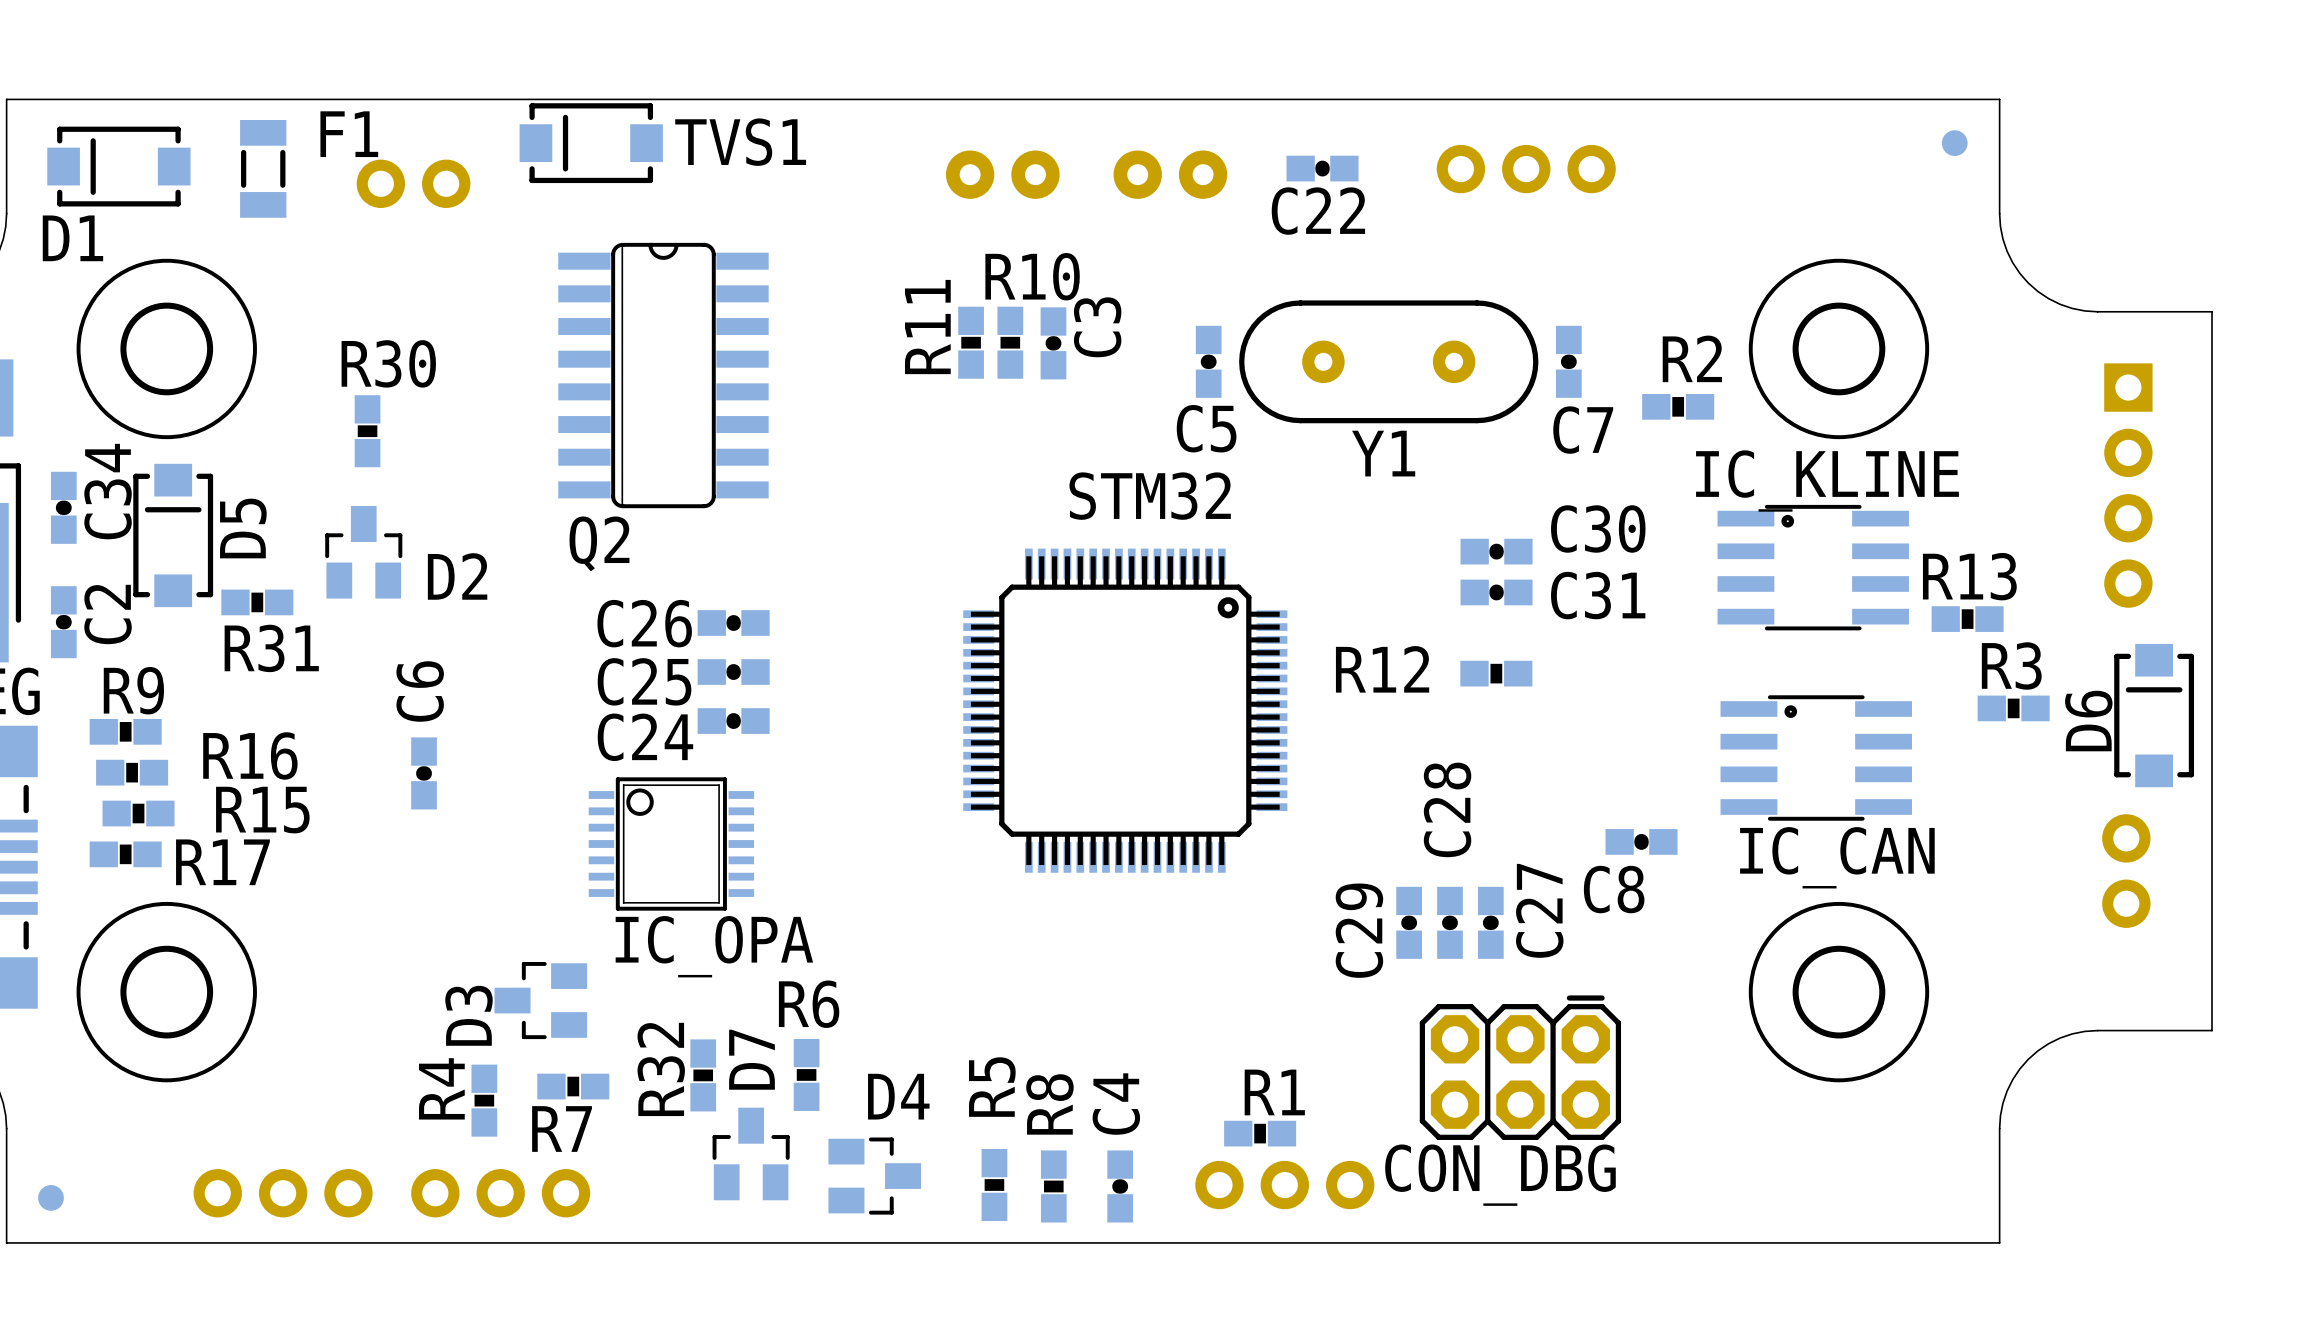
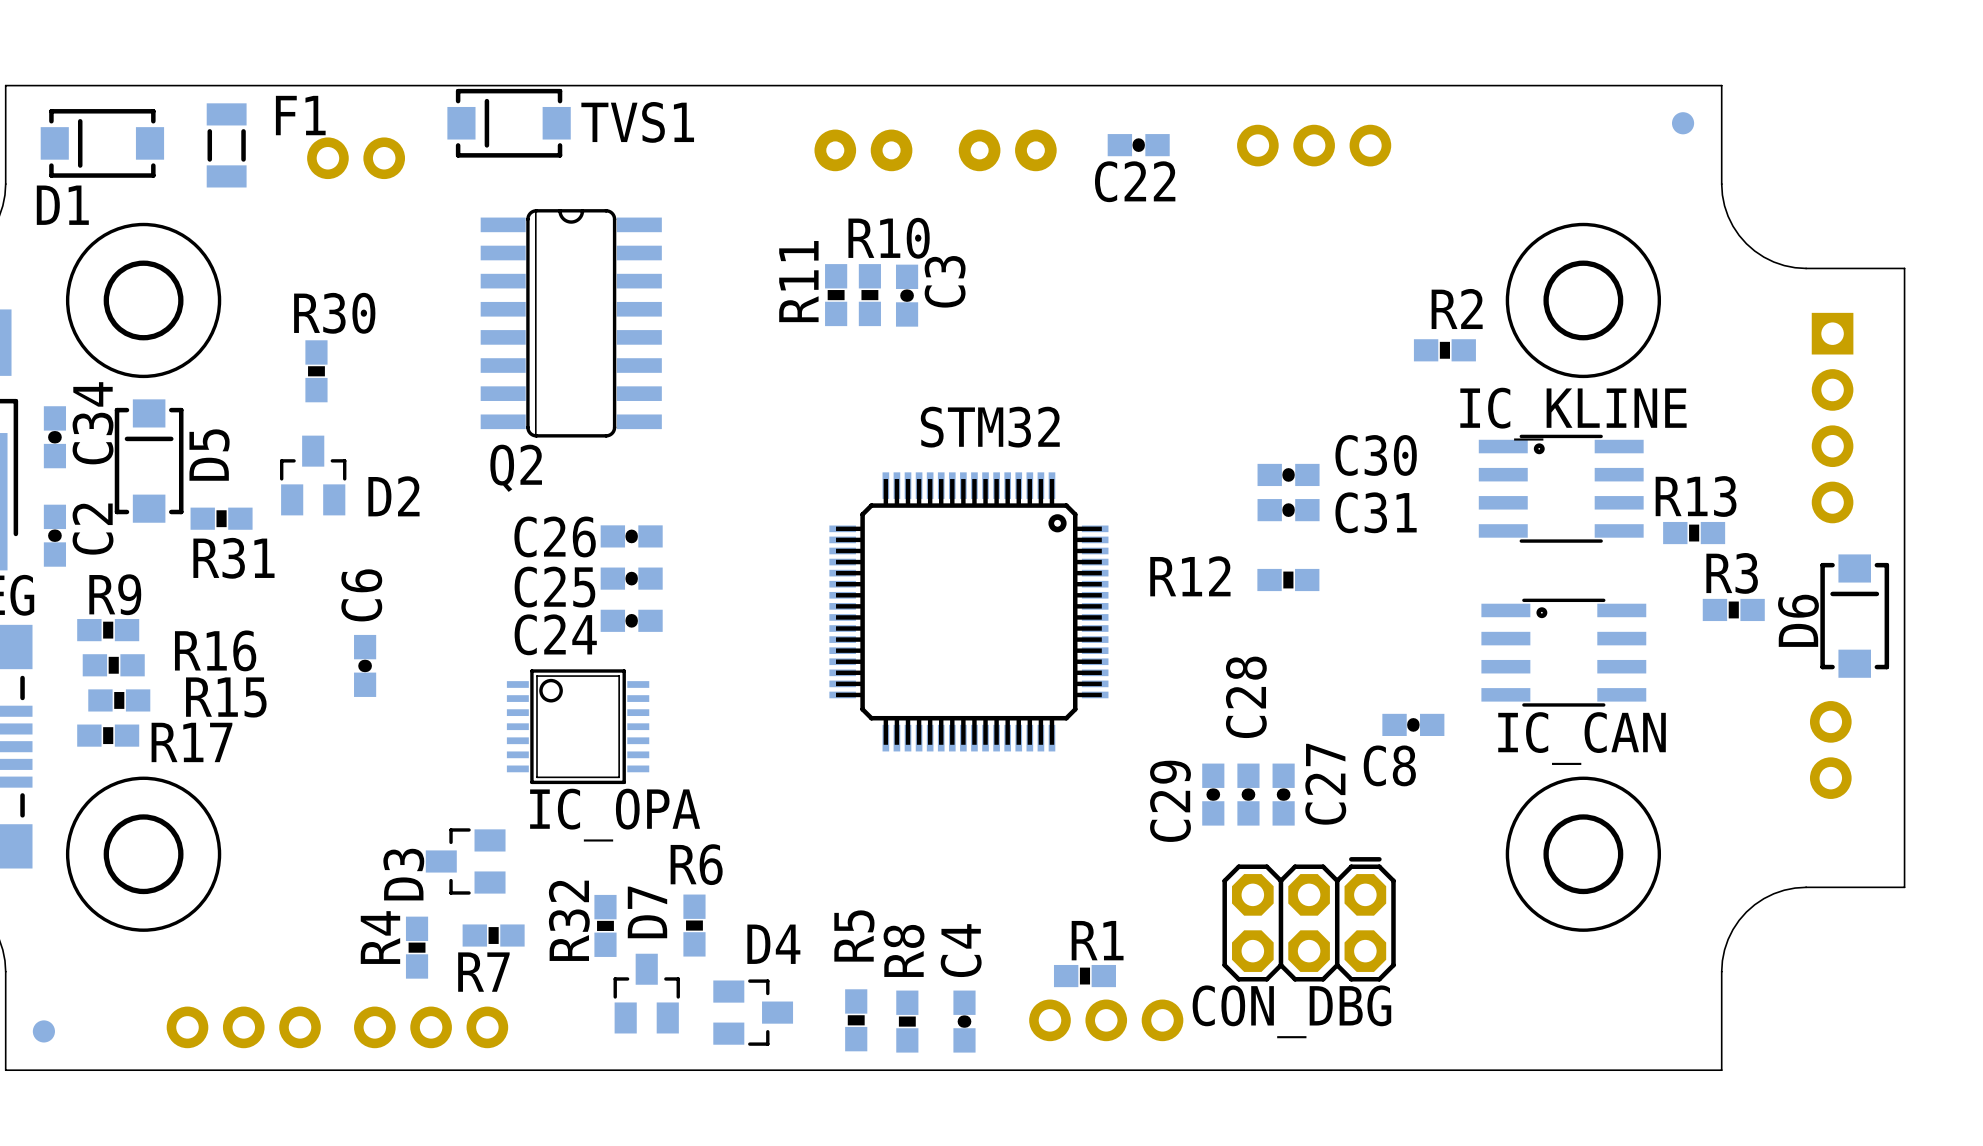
C5: (1208, 361) -> none
Y1: (1388, 361) -> none
C7: (1568, 361) -> none

